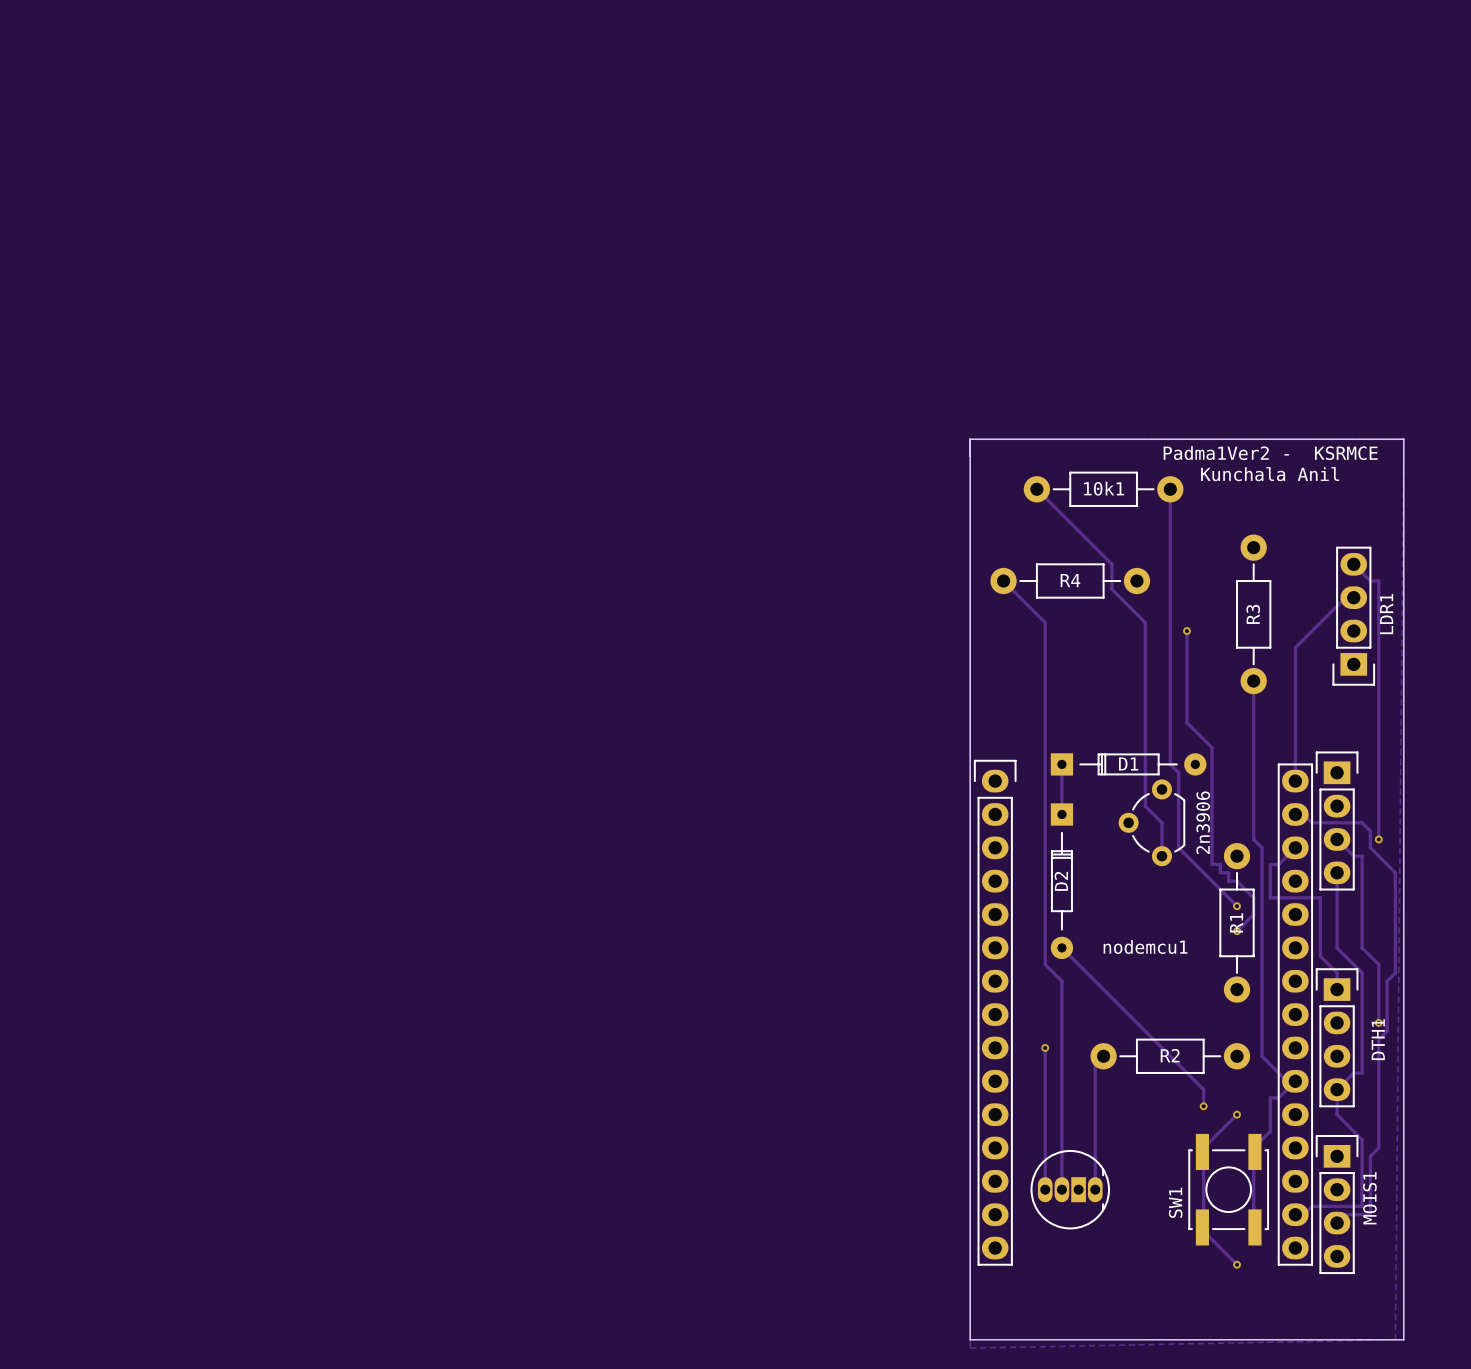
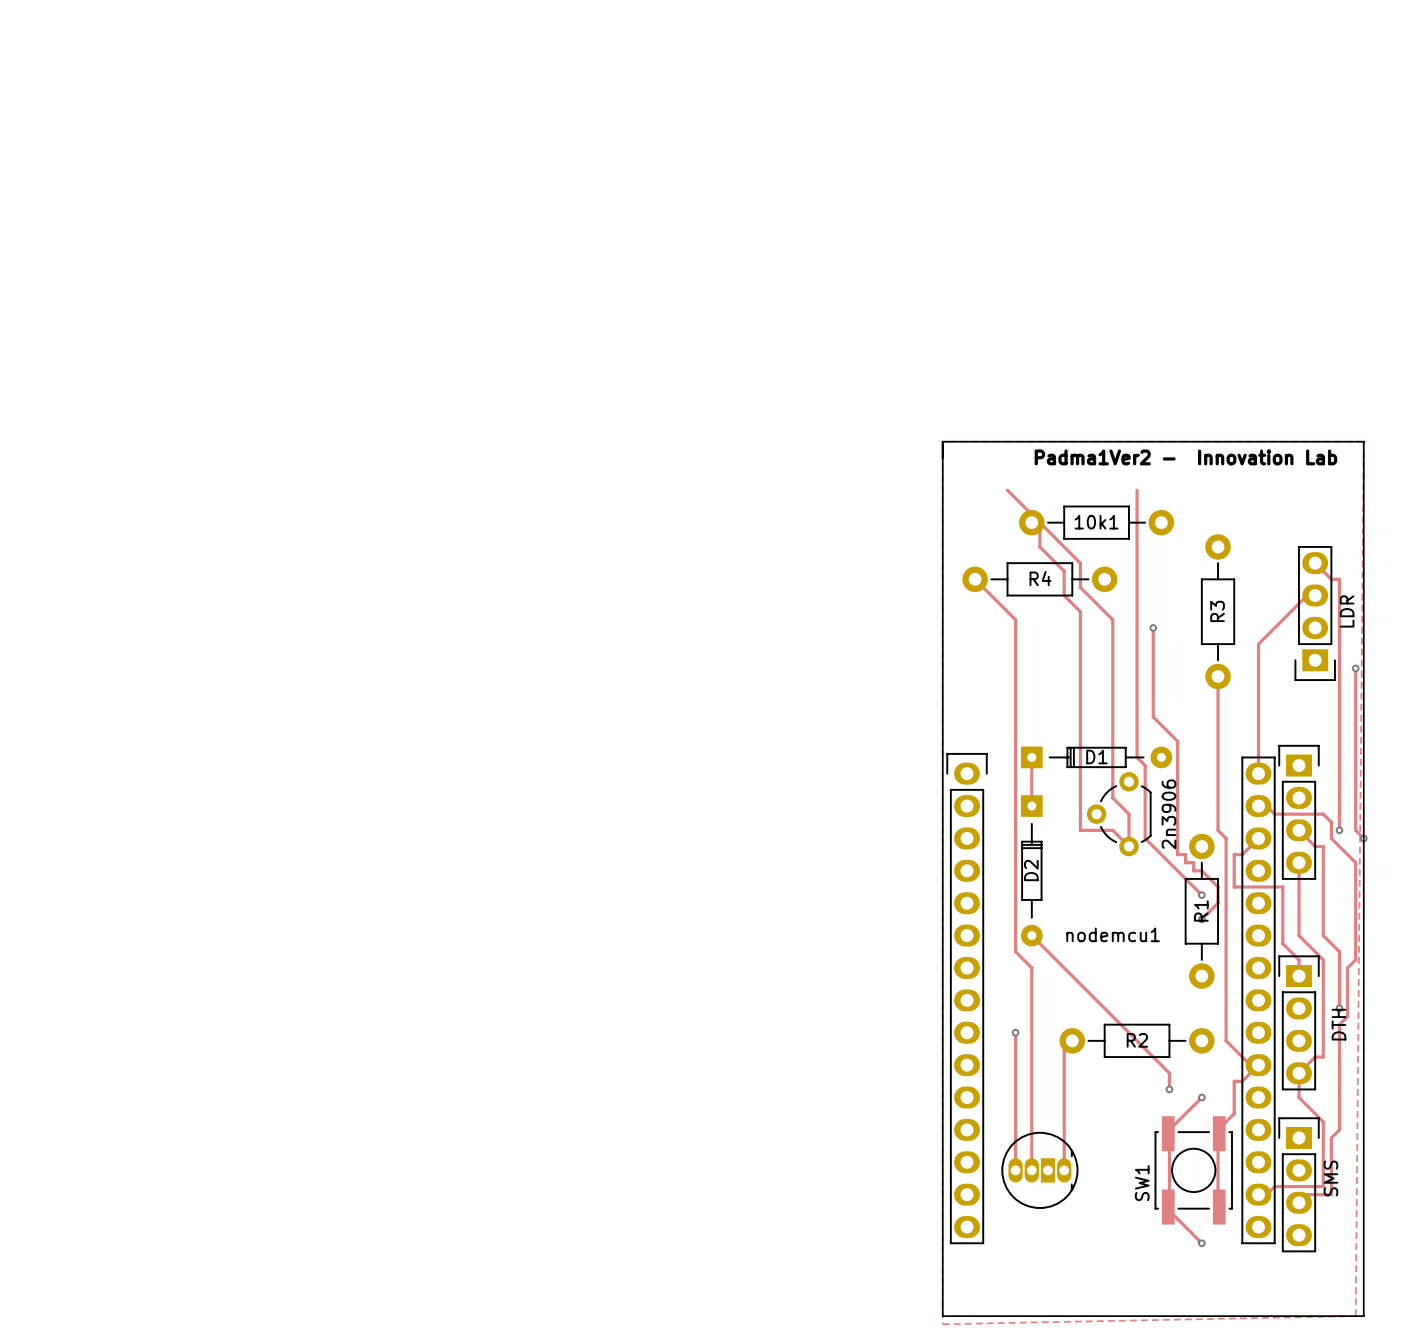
text: Padma1Ver2 - KSRMCE (1270, 453) -> none
text: none -> Padma1Ver2 - Innovation Lab (1185, 457)
text: Kunchala Anil (1270, 474) -> none
10k1 position: (1103, 489) -> (1096, 522)
track: none -> (1031, 522) (1039, 530) (1039, 546) (1064, 571) (1064, 595) (1080, 611) (1080, 830) (1112, 830) (1128, 846)
LDR1 name: LDR1 (1386, 614) -> LDR (1347, 611)
track: none -> (1355, 668) (1355, 830) (1363, 838)
via: none -> (1355, 668)
via: none -> (1363, 838)
DTH1 name: DTH1 (1378, 1039) -> DTH (1339, 1024)
MOIS1 name: MOIS1 (1369, 1198) -> SMS (1330, 1178)

